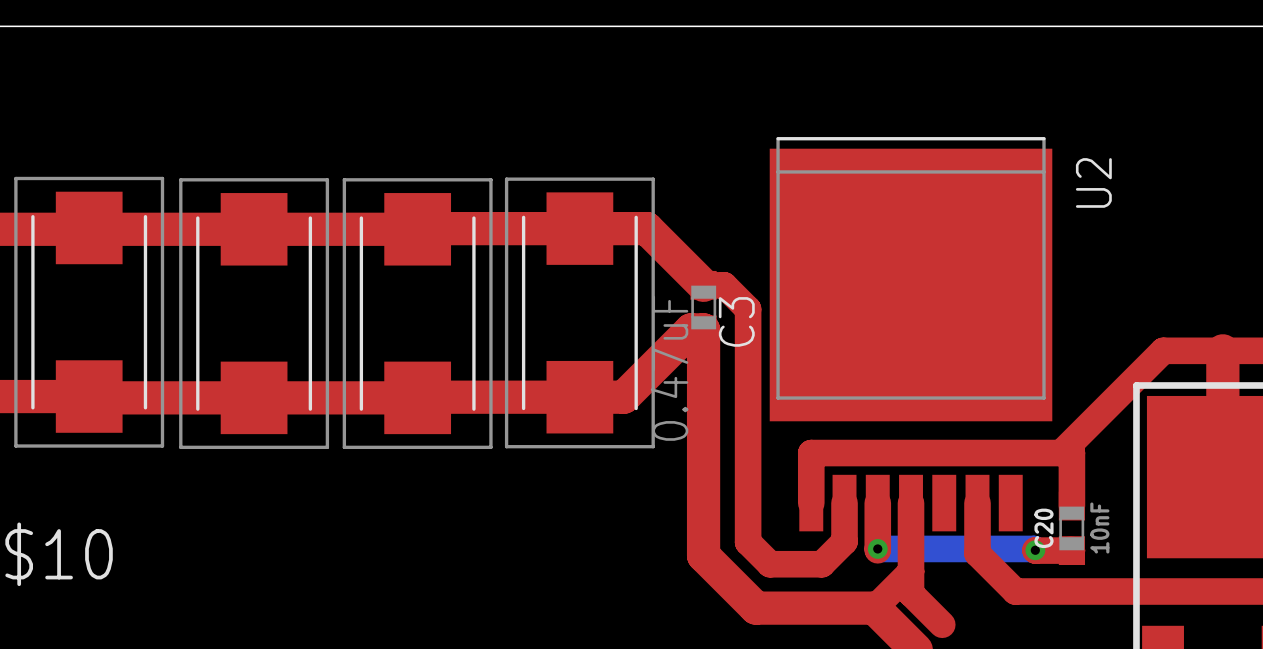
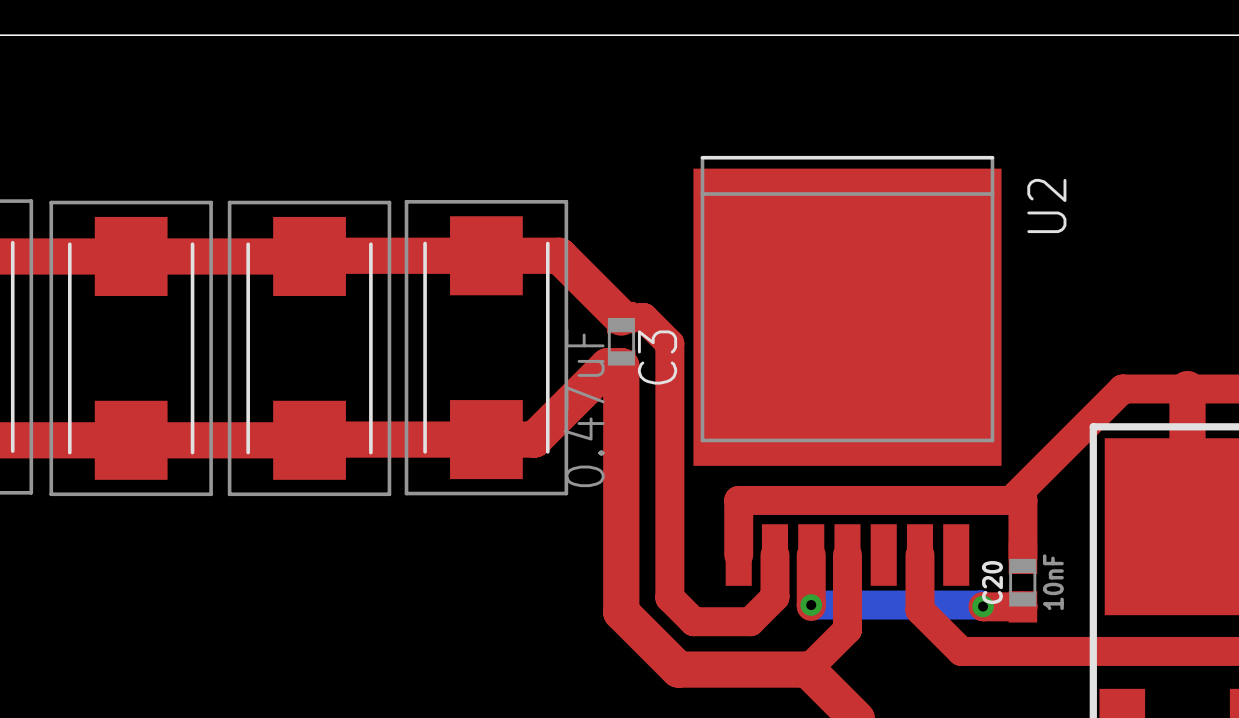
top track: (911, 571) (911, 593) (942, 624) -> none

